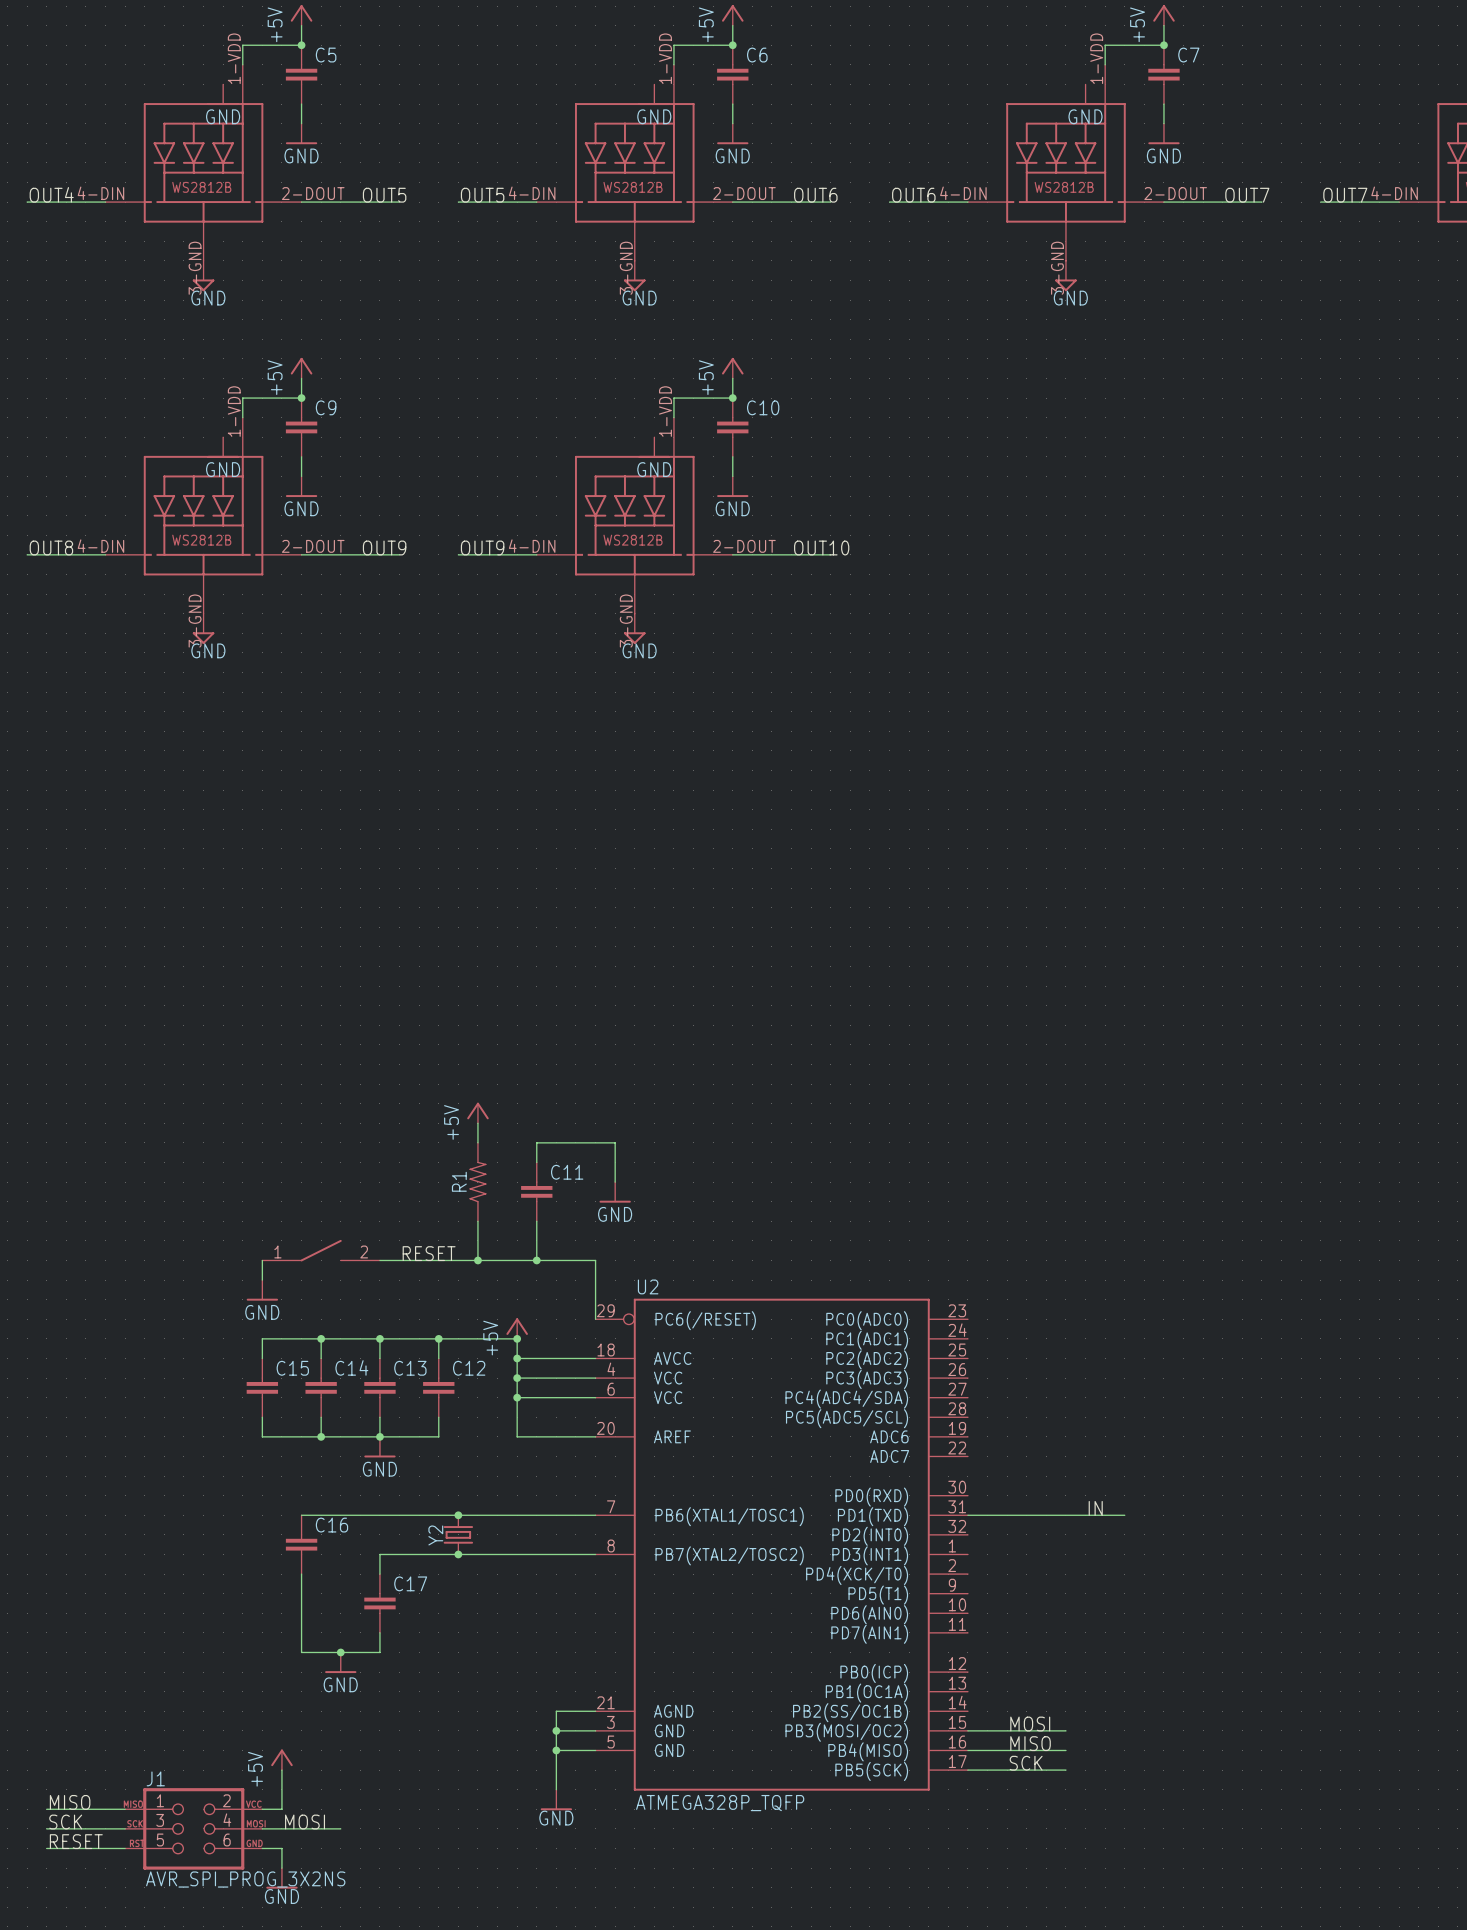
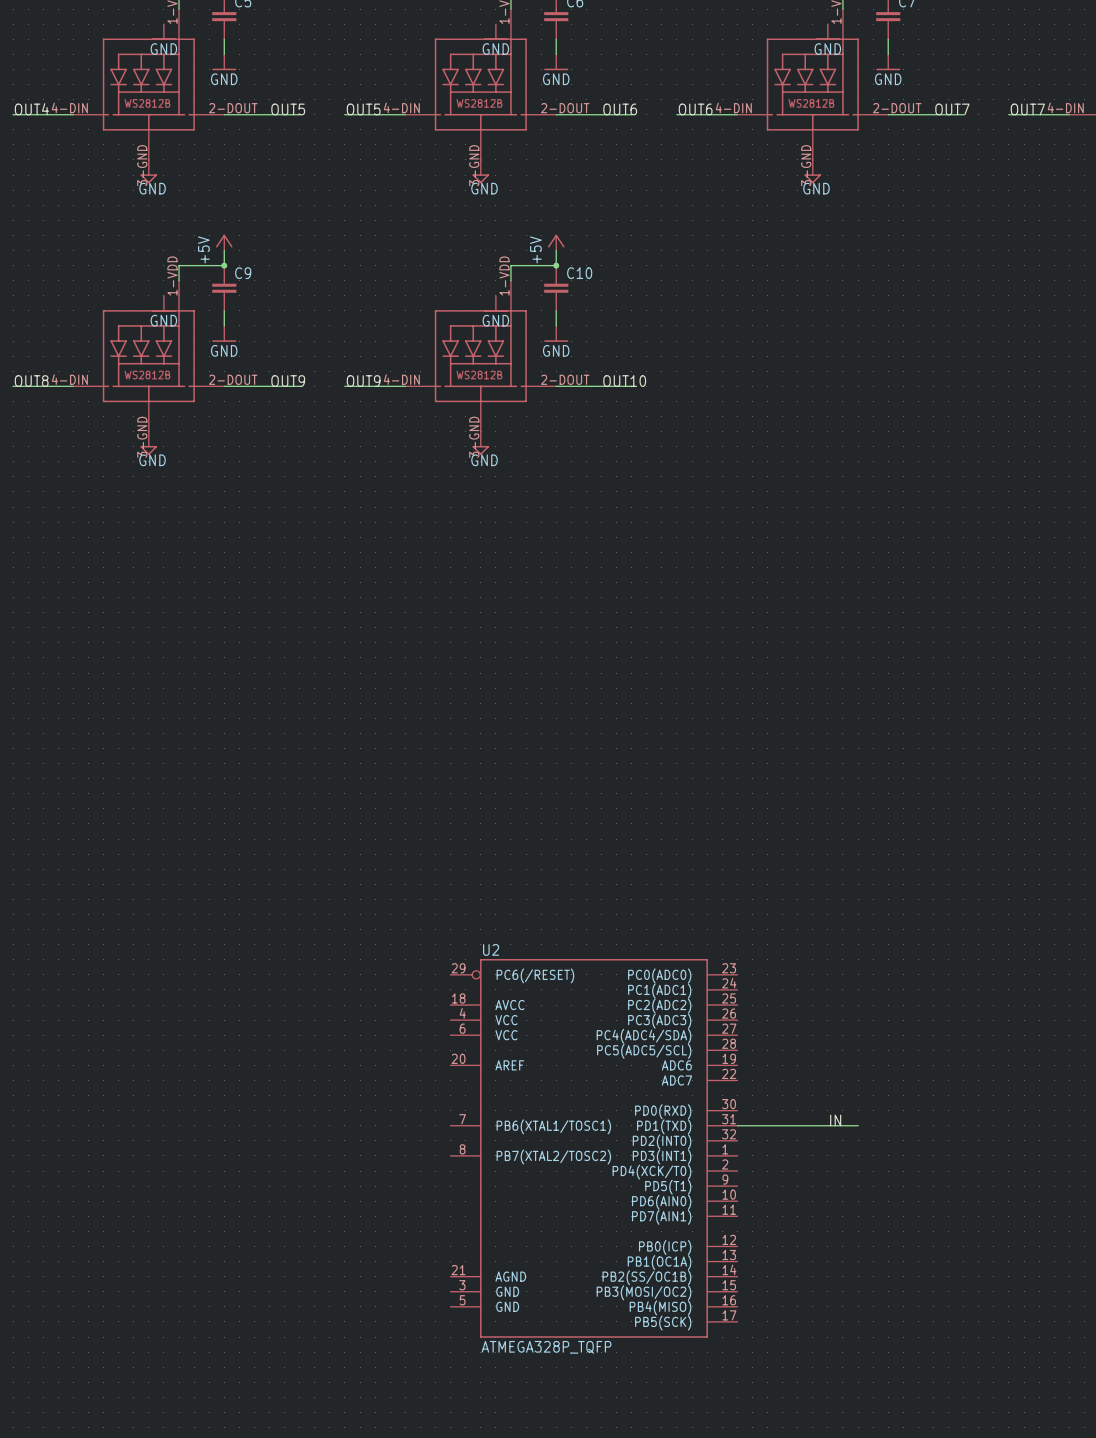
power symbol: +5V (477, 1112) -> none
wire: (477, 1123) (477, 1142) -> none
wire: (536, 1162) (536, 1142) (615, 1142) (615, 1182) -> none
R1: (477, 1182) -> none
C11: (536, 1191) -> none
power symbol: GND (615, 1192) -> none
wire: (477, 1221) (477, 1260) -> none
wire: (536, 1221) (536, 1260) -> none
part: (321, 1250) -> none
label: RESET (429, 1253) -> none
wire: (262, 1260) (262, 1280) -> none
wire: (379, 1260) (595, 1260) (595, 1319) -> none
junction: (477, 1260) -> none
junction: (536, 1260) -> none
power symbol: GND (262, 1290) -> none
power symbol: +5V (517, 1328) -> none
wire: (321, 1338) (321, 1358) -> none
junction: (321, 1338) -> none
wire: (379, 1338) (379, 1358) -> none
junction: (379, 1338) -> none
wire: (438, 1338) (438, 1358) -> none
junction: (438, 1338) -> none
junction: (517, 1338) -> none
wire: (262, 1358) (262, 1338) (517, 1338) (517, 1436) (595, 1436) -> none
wire: (517, 1358) (595, 1358) -> none
junction: (517, 1358) -> none
wire: (517, 1378) (595, 1378) -> none
junction: (517, 1378) -> none
C15: (262, 1387) -> none
C14: (321, 1387) -> none
C13: (379, 1387) -> none
C12: (438, 1387) -> none
wire: (517, 1397) (595, 1397) -> none
junction: (517, 1397) -> none
wire: (262, 1417) (262, 1436) (438, 1436) (438, 1417) -> none
wire: (321, 1417) (321, 1436) -> none
wire: (379, 1417) (379, 1436) -> none
junction: (321, 1436) -> none
junction: (379, 1436) -> none
power symbol: GND (379, 1447) -> none
wire: (301, 1515) (595, 1515) -> none
junction: (458, 1515) -> none
Y2: (458, 1534) -> none
C16: (301, 1544) -> none
junction: (458, 1554) -> none
wire: (595, 1554) (379, 1554) (379, 1574) -> none
wire: (301, 1574) (301, 1652) (379, 1652) (379, 1632) -> none
C17: (379, 1603) -> none
junction: (340, 1652) -> none
power symbol: GND (340, 1662) -> none
wire: (595, 1711) (556, 1711) (556, 1789) -> none
label: MOSI (1030, 1724) -> none
wire: (556, 1730) (595, 1730) -> none
junction: (556, 1730) -> none
wire: (967, 1730) (1065, 1730) -> none
label: MISO (1030, 1743) -> none
wire: (556, 1750) (595, 1750) -> none
junction: (556, 1750) -> none
wire: (967, 1750) (1065, 1750) -> none
power symbol: +5V (281, 1759) -> none
label: SCK (1026, 1763) -> none
wire: (281, 1770) (281, 1809) (262, 1809) -> none
wire: (967, 1770) (1065, 1770) -> none
power symbol: GND (556, 1799) -> none
label: MISO (70, 1802) -> none
wire: (46, 1809) (125, 1809) -> none
label: SCK (65, 1822) -> none
label: MOSI (305, 1822) -> none
wire: (46, 1828) (125, 1828) -> none
J1: AVR_SPI_PROG_3X2NS (193, 1828) -> none
wire: (262, 1828) (340, 1828) -> none
label: RESET (76, 1841) -> none
wire: (46, 1848) (125, 1848) -> none
wire: (262, 1848) (281, 1848) (281, 1868) -> none
power symbol: GND (281, 1878) -> none

